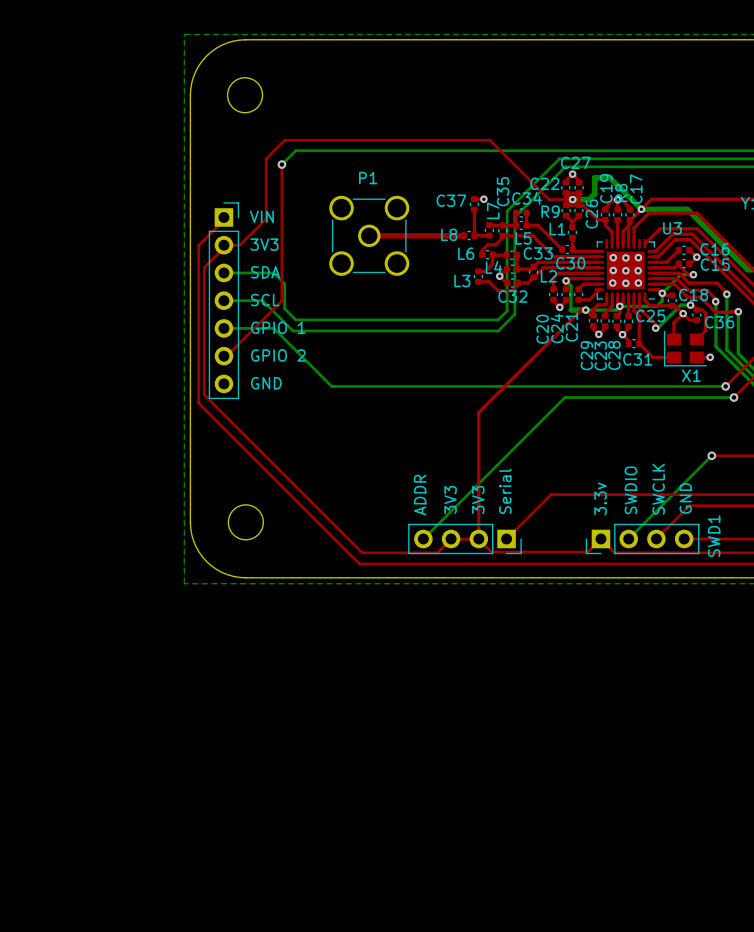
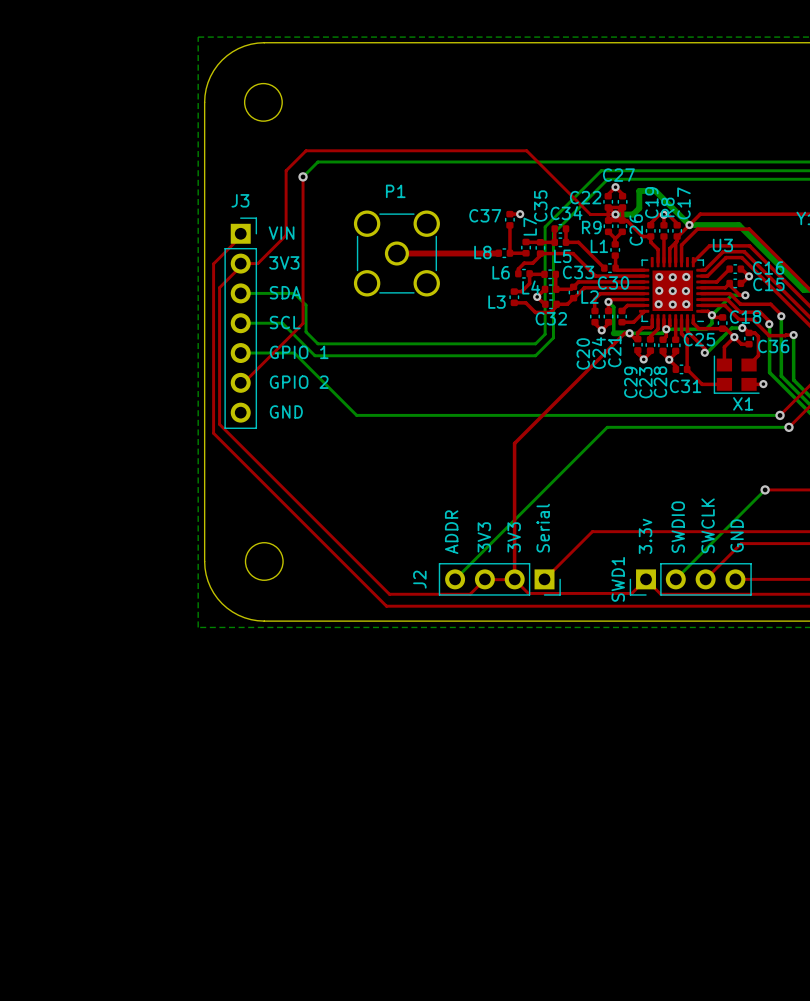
J3 name: none -> J3 (240, 200)
SWD1 name position: SWD1 (714, 536) -> SWD1 (618, 579)
J2 name: none -> J2 (419, 579)

